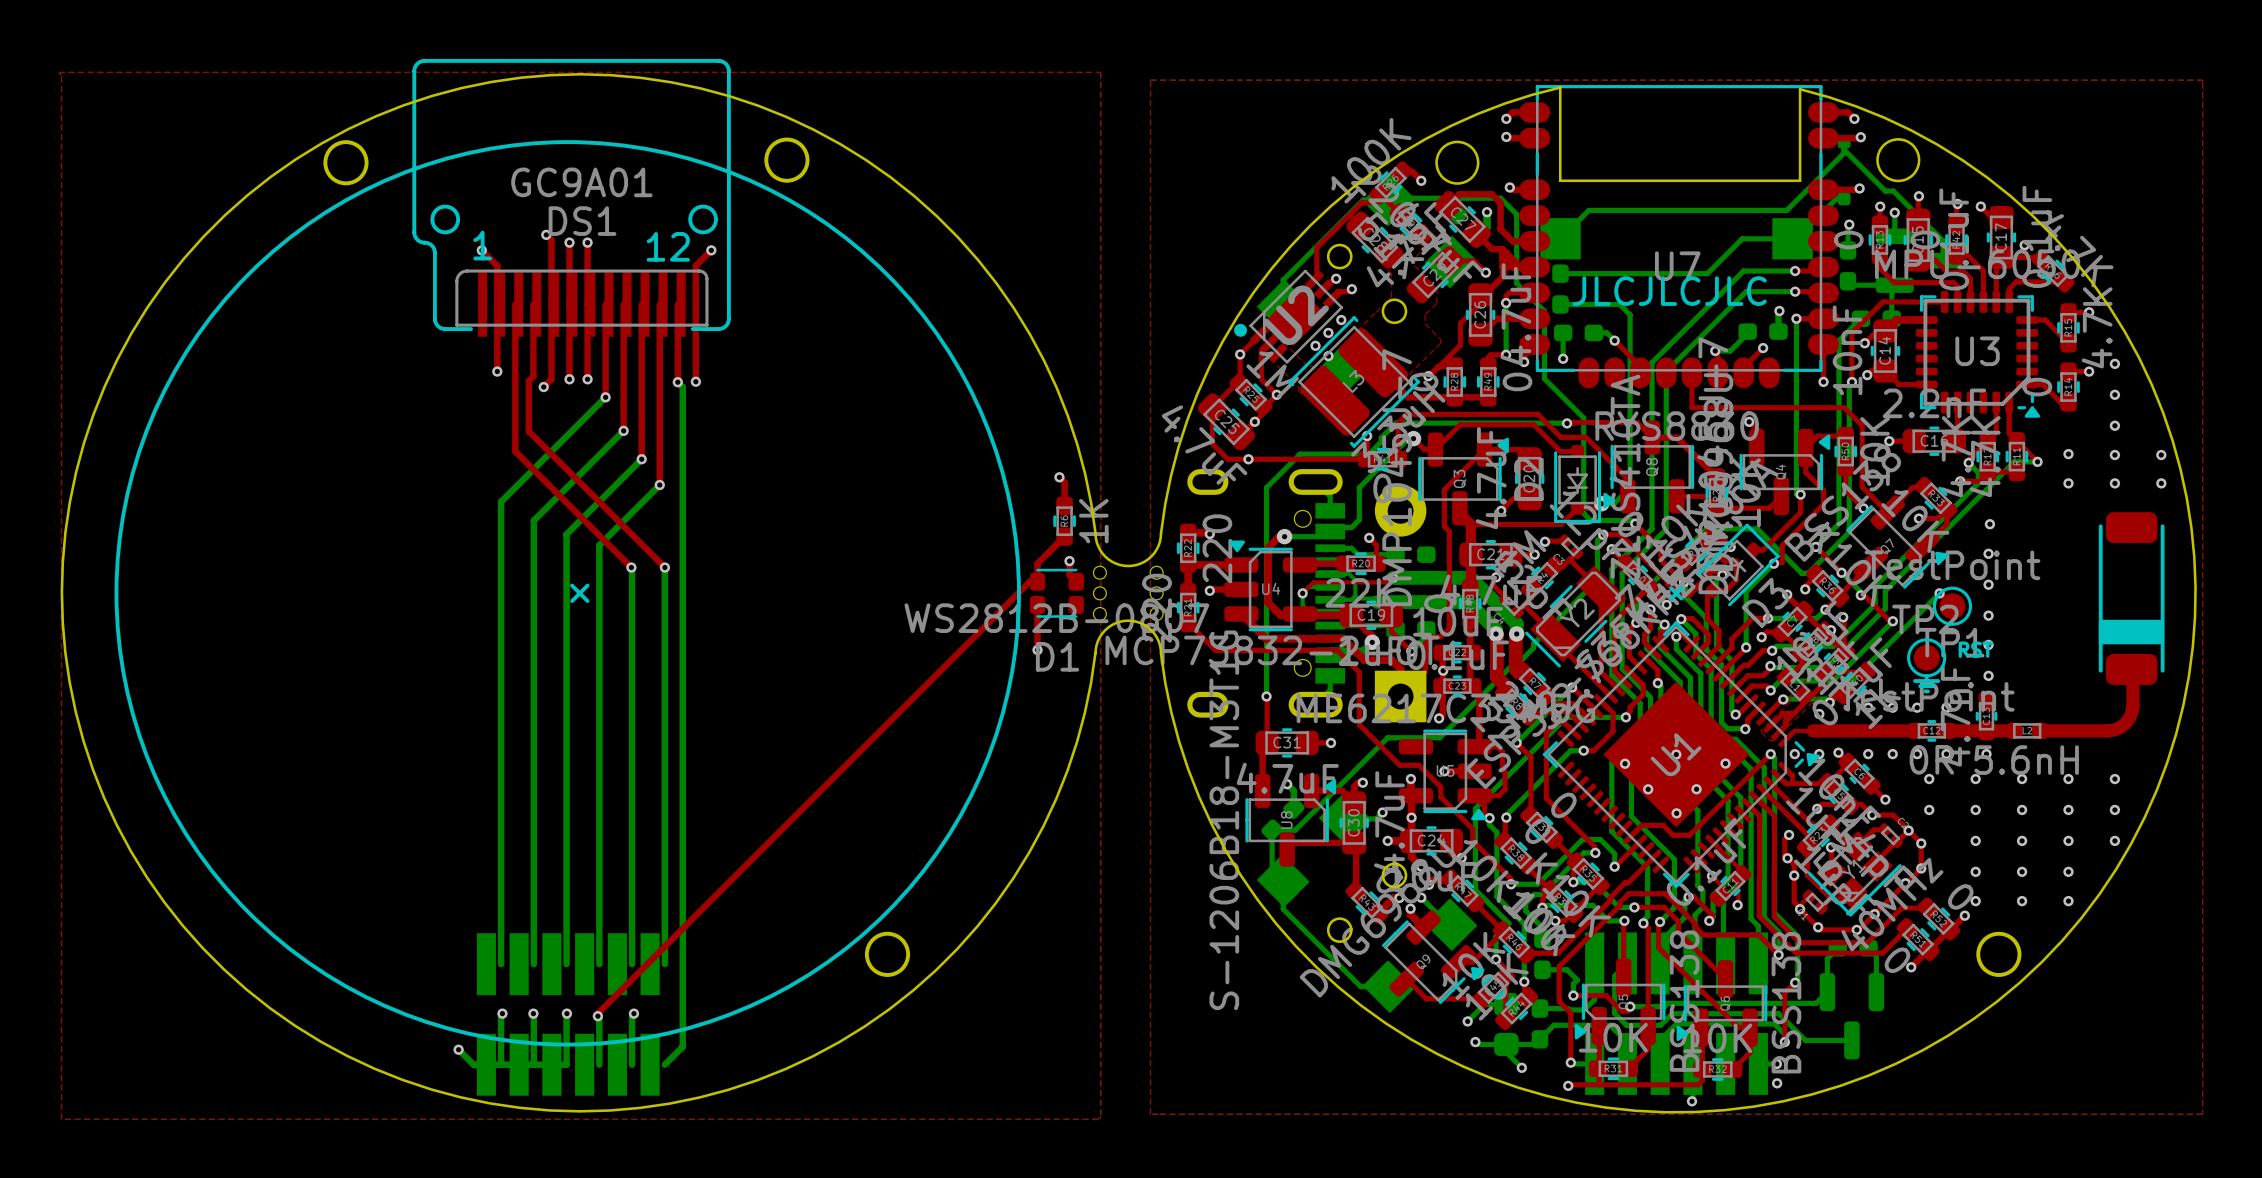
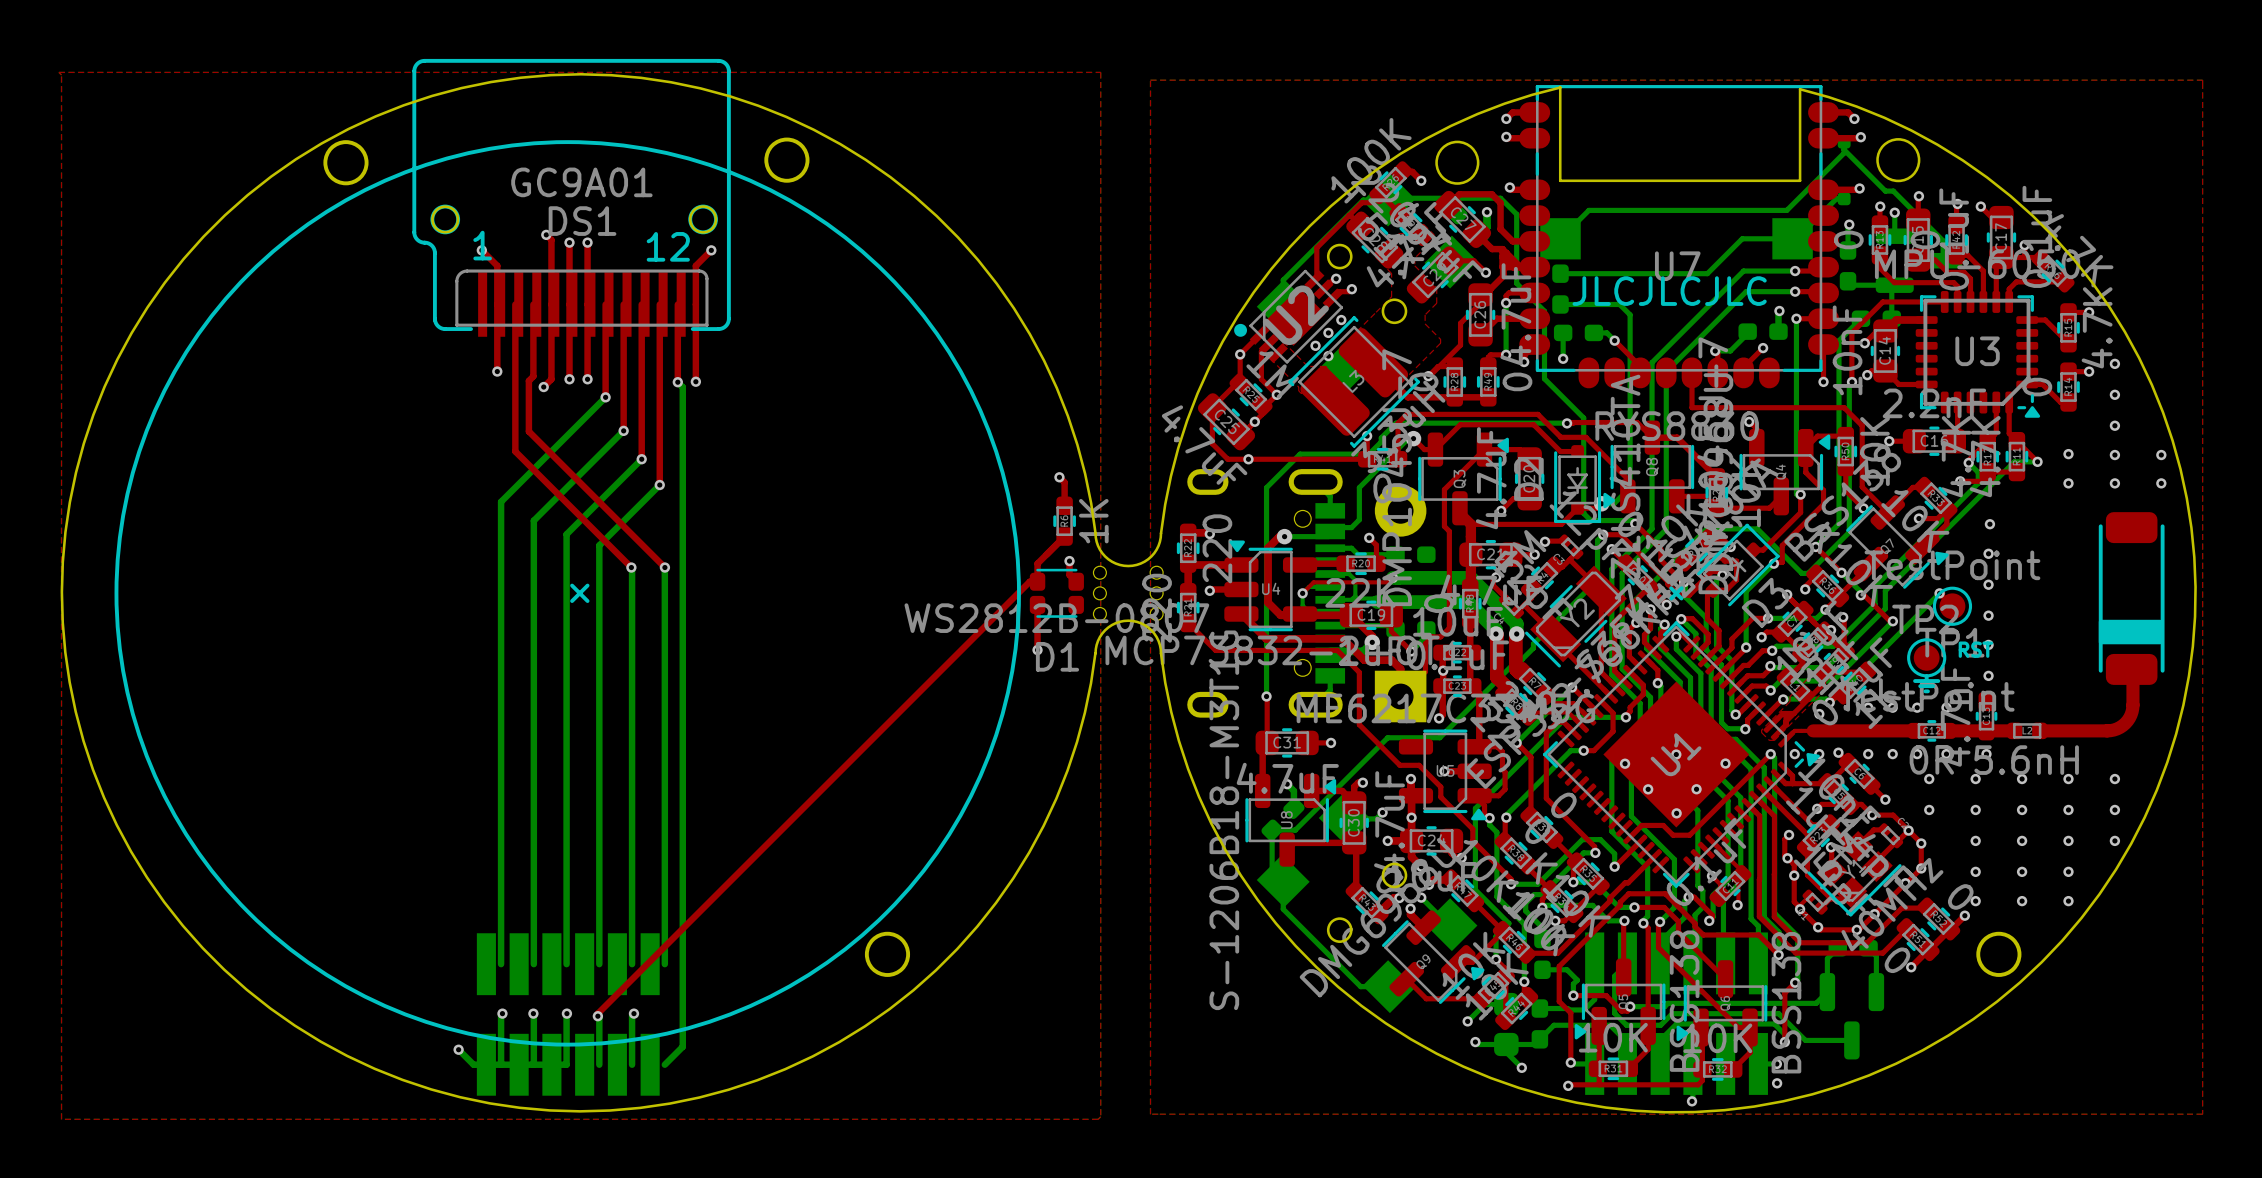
round board edge: none -> [431, 205, 460, 234]
round board edge: none -> [688, 205, 718, 234]

